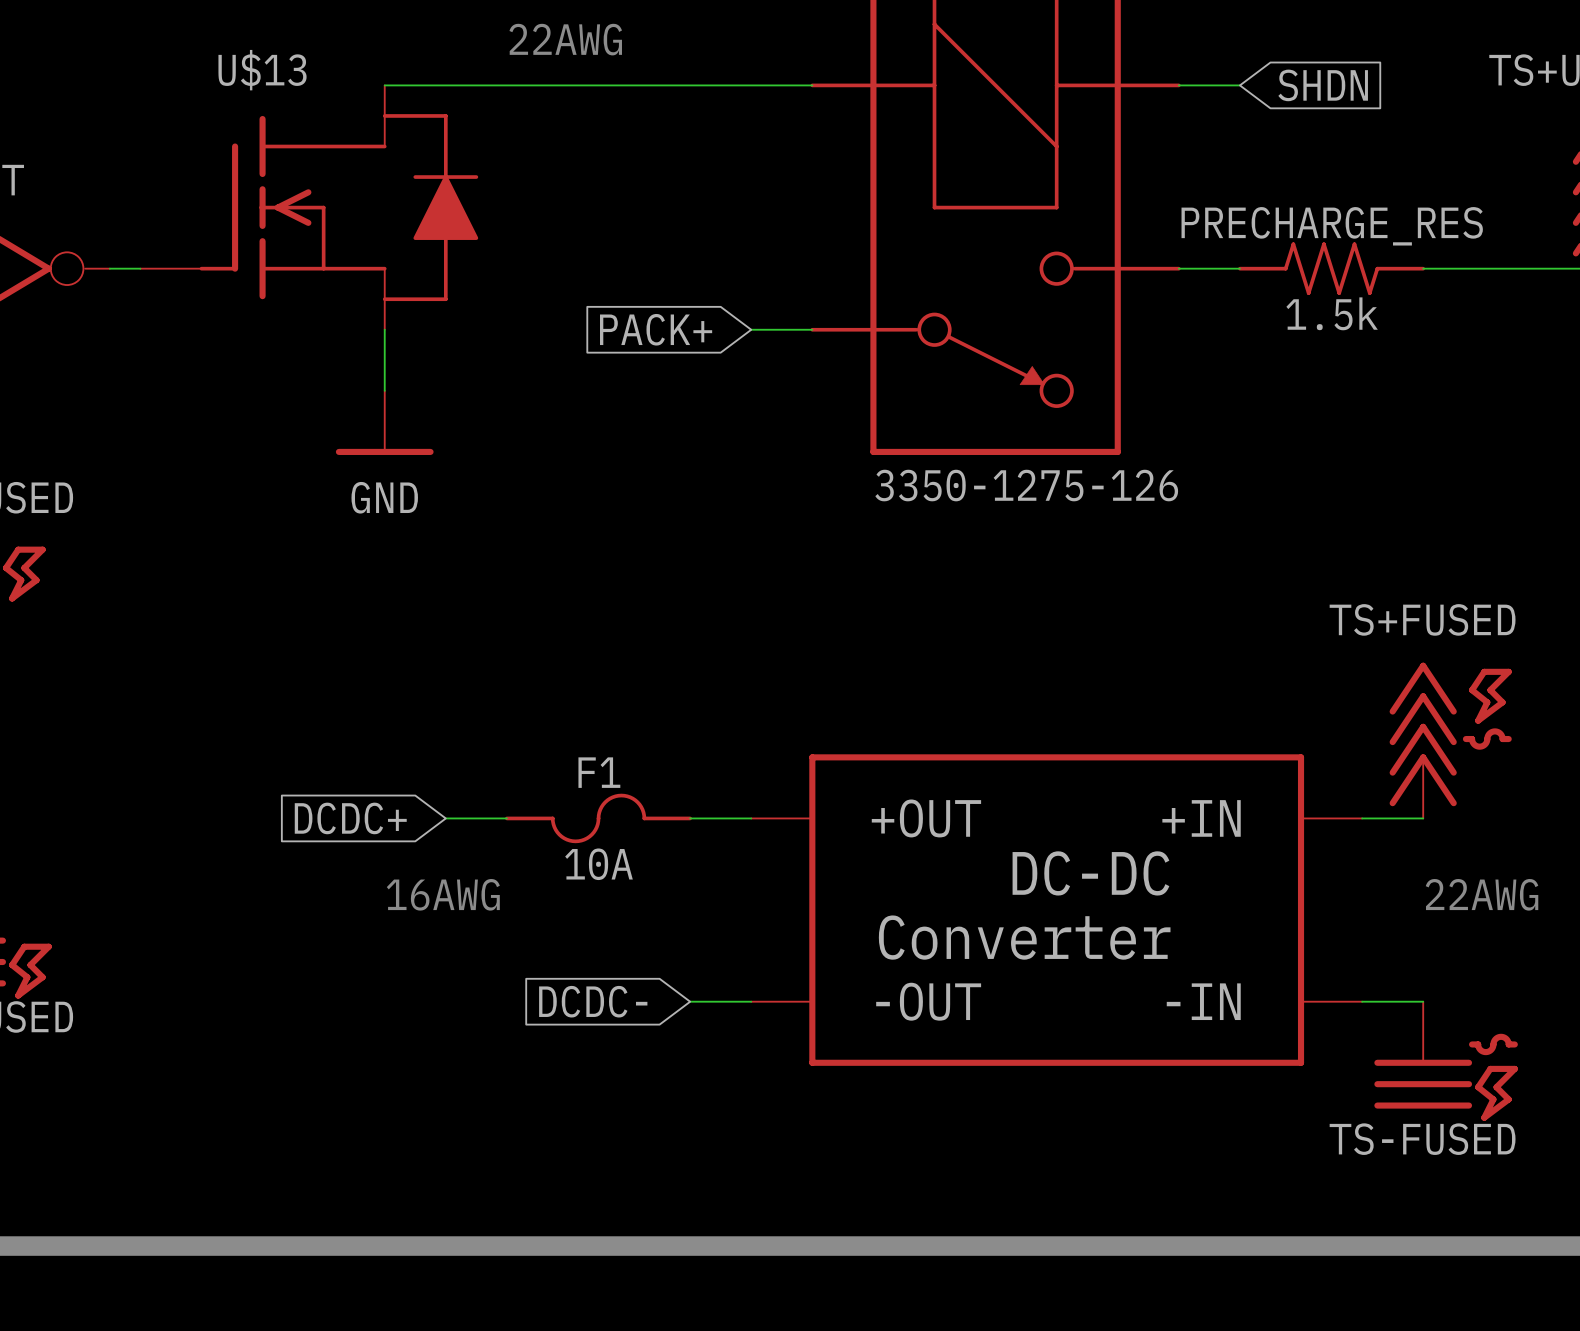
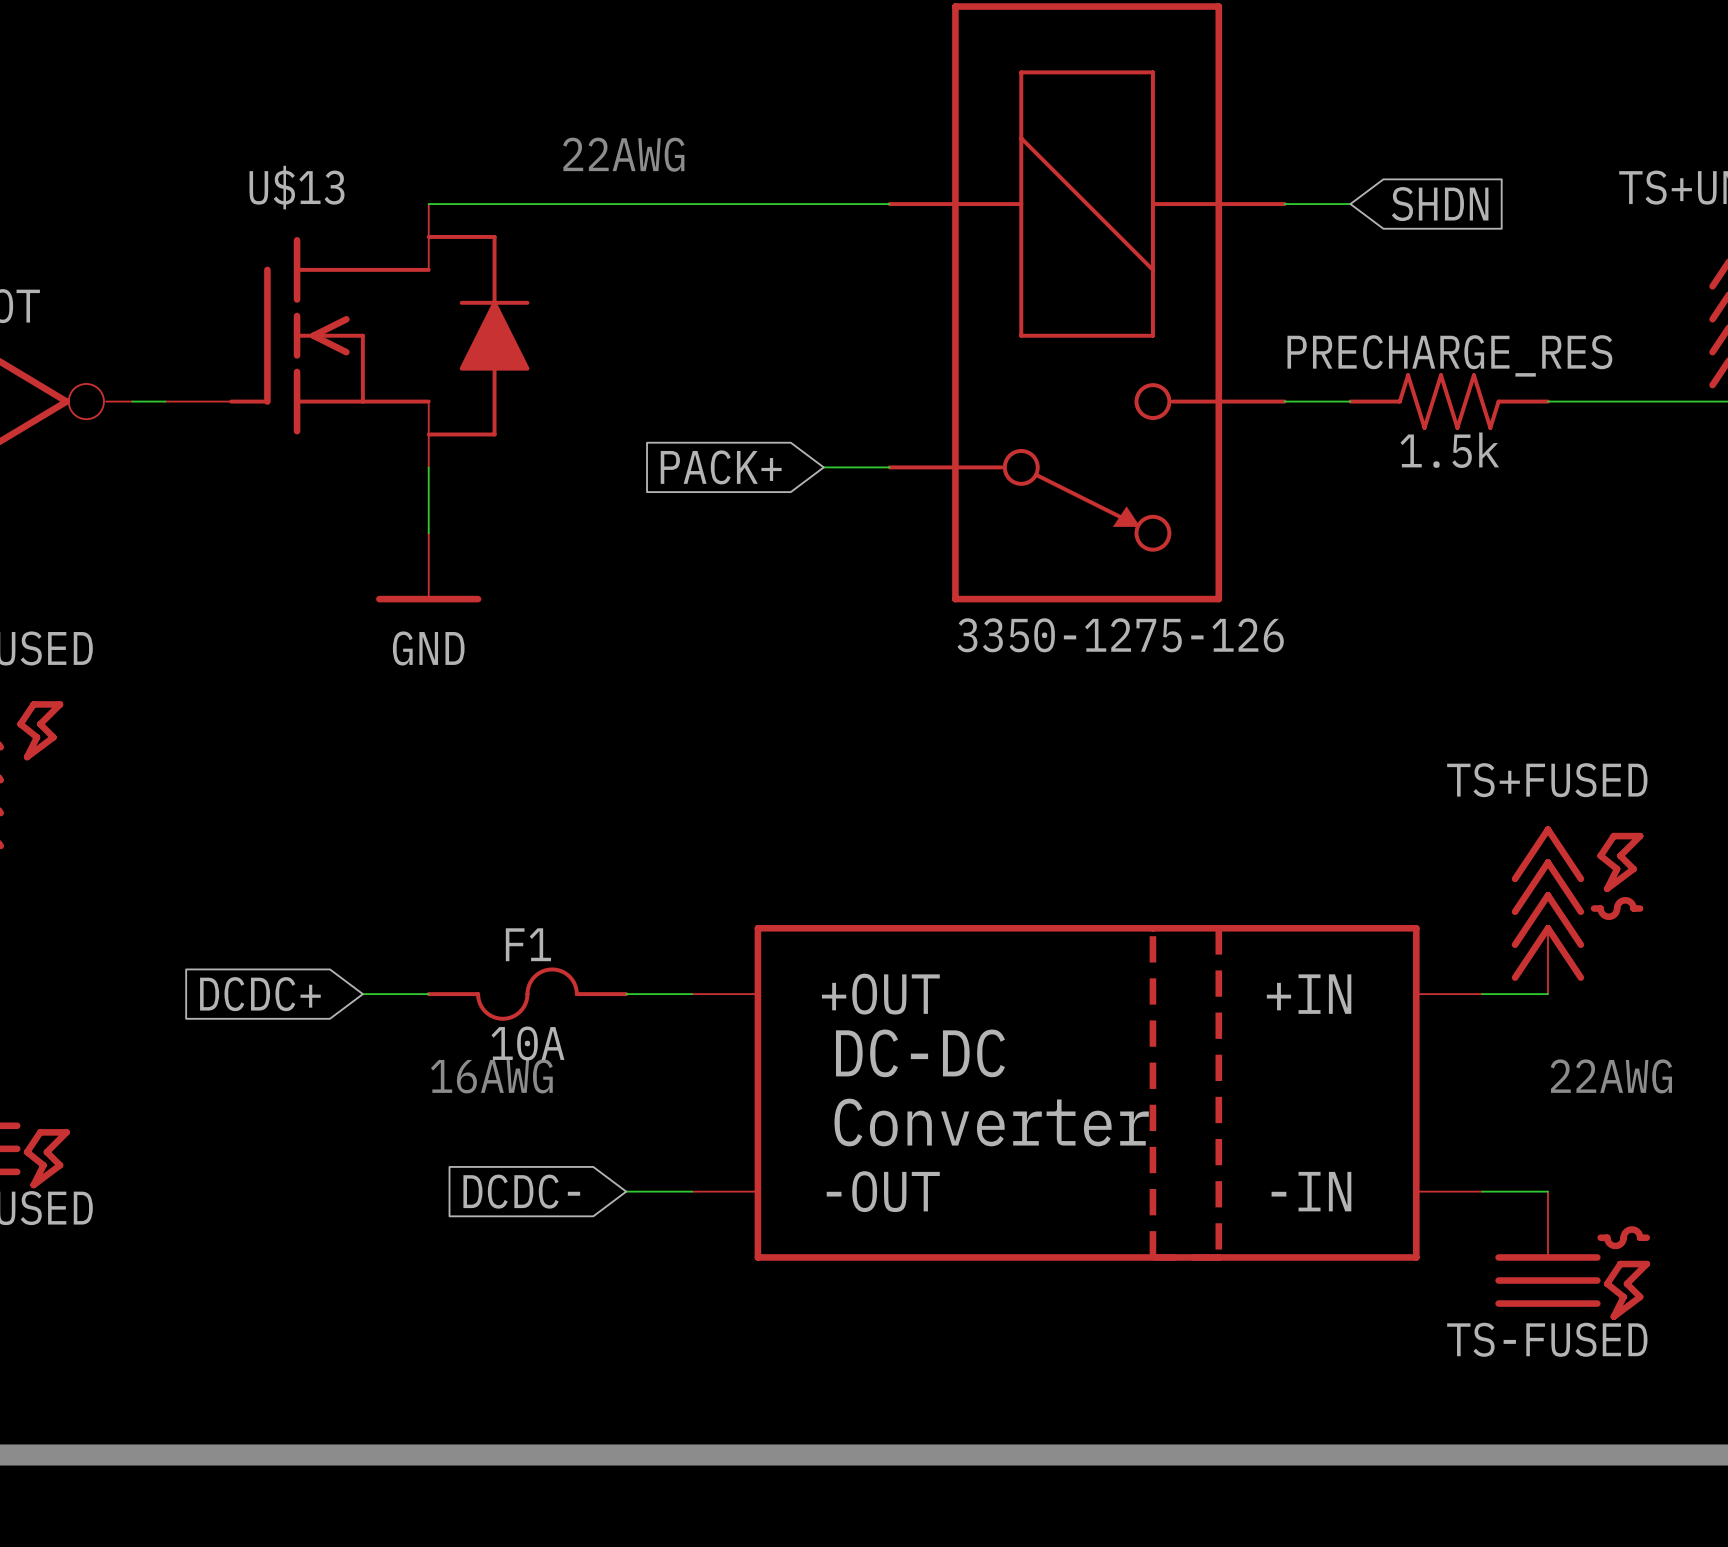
global label position: DCDC+ (350, 818) -> DCDC+ (260, 994)
wire: (445, 818) (506, 818) -> (626, 994) (692, 994)
F1 position: (598, 818) -> (527, 994)
wire: (690, 818) (751, 818) -> (362, 994) (428, 994)
part: none -> (1087, 1092)
part: (1056, 910) -> none
global label position: DCDC- (593, 1001) -> DCDC- (521, 1191)
wire: (690, 1001) (751, 1001) -> (626, 1191) (692, 1191)

